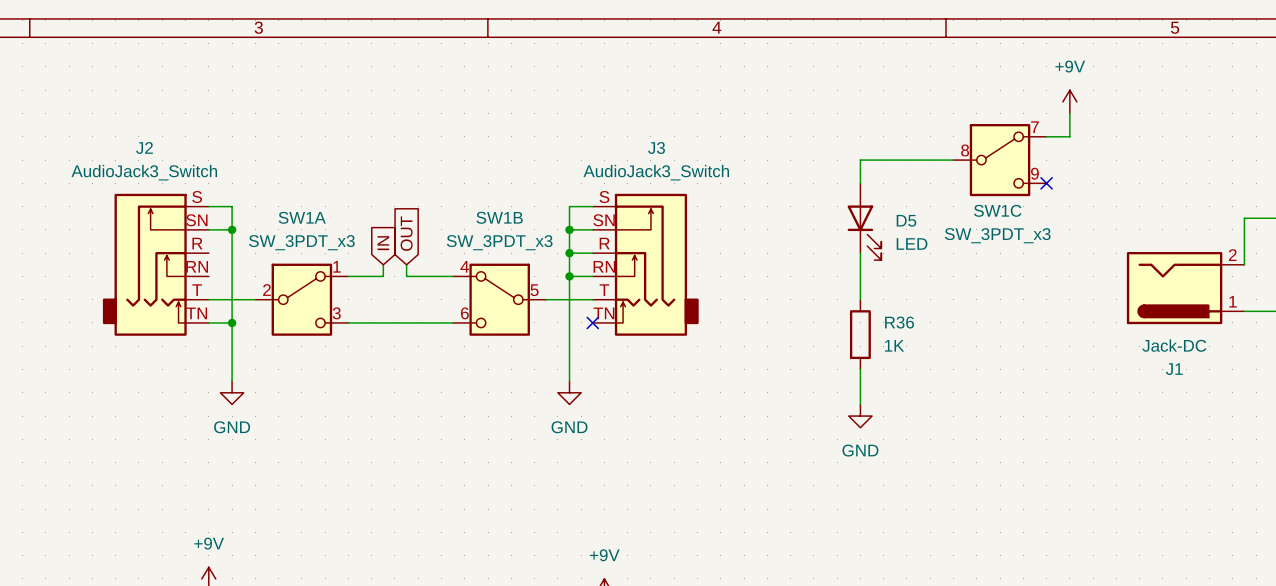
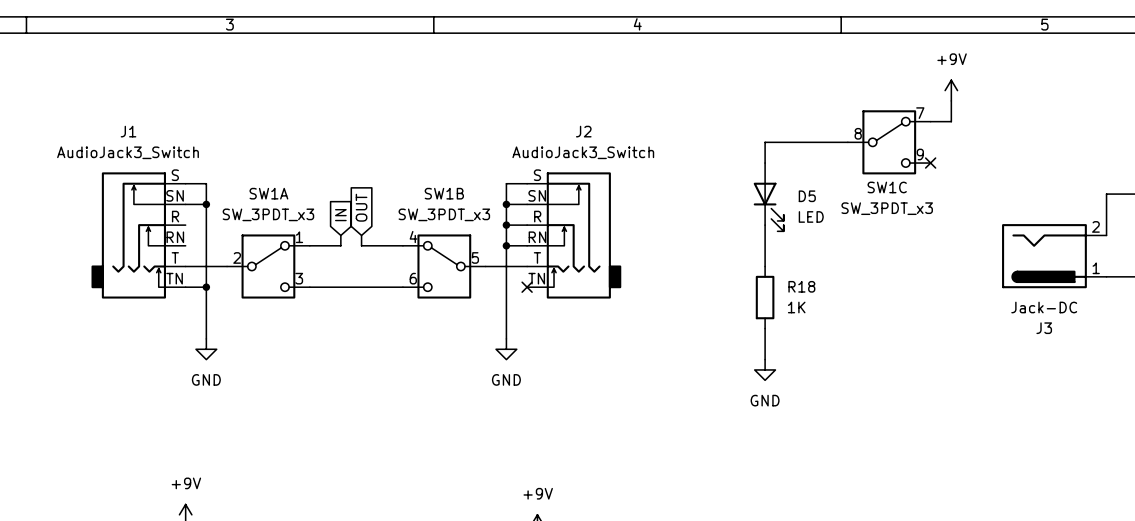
J2 name: J2 (144, 147) -> J1 (128, 131)
J3 name: J3 (656, 147) -> J2 (583, 131)
R36 name: R36 (899, 322) -> R18 (801, 286)
J1 name: J1 (1174, 369) -> J3 (1044, 328)

